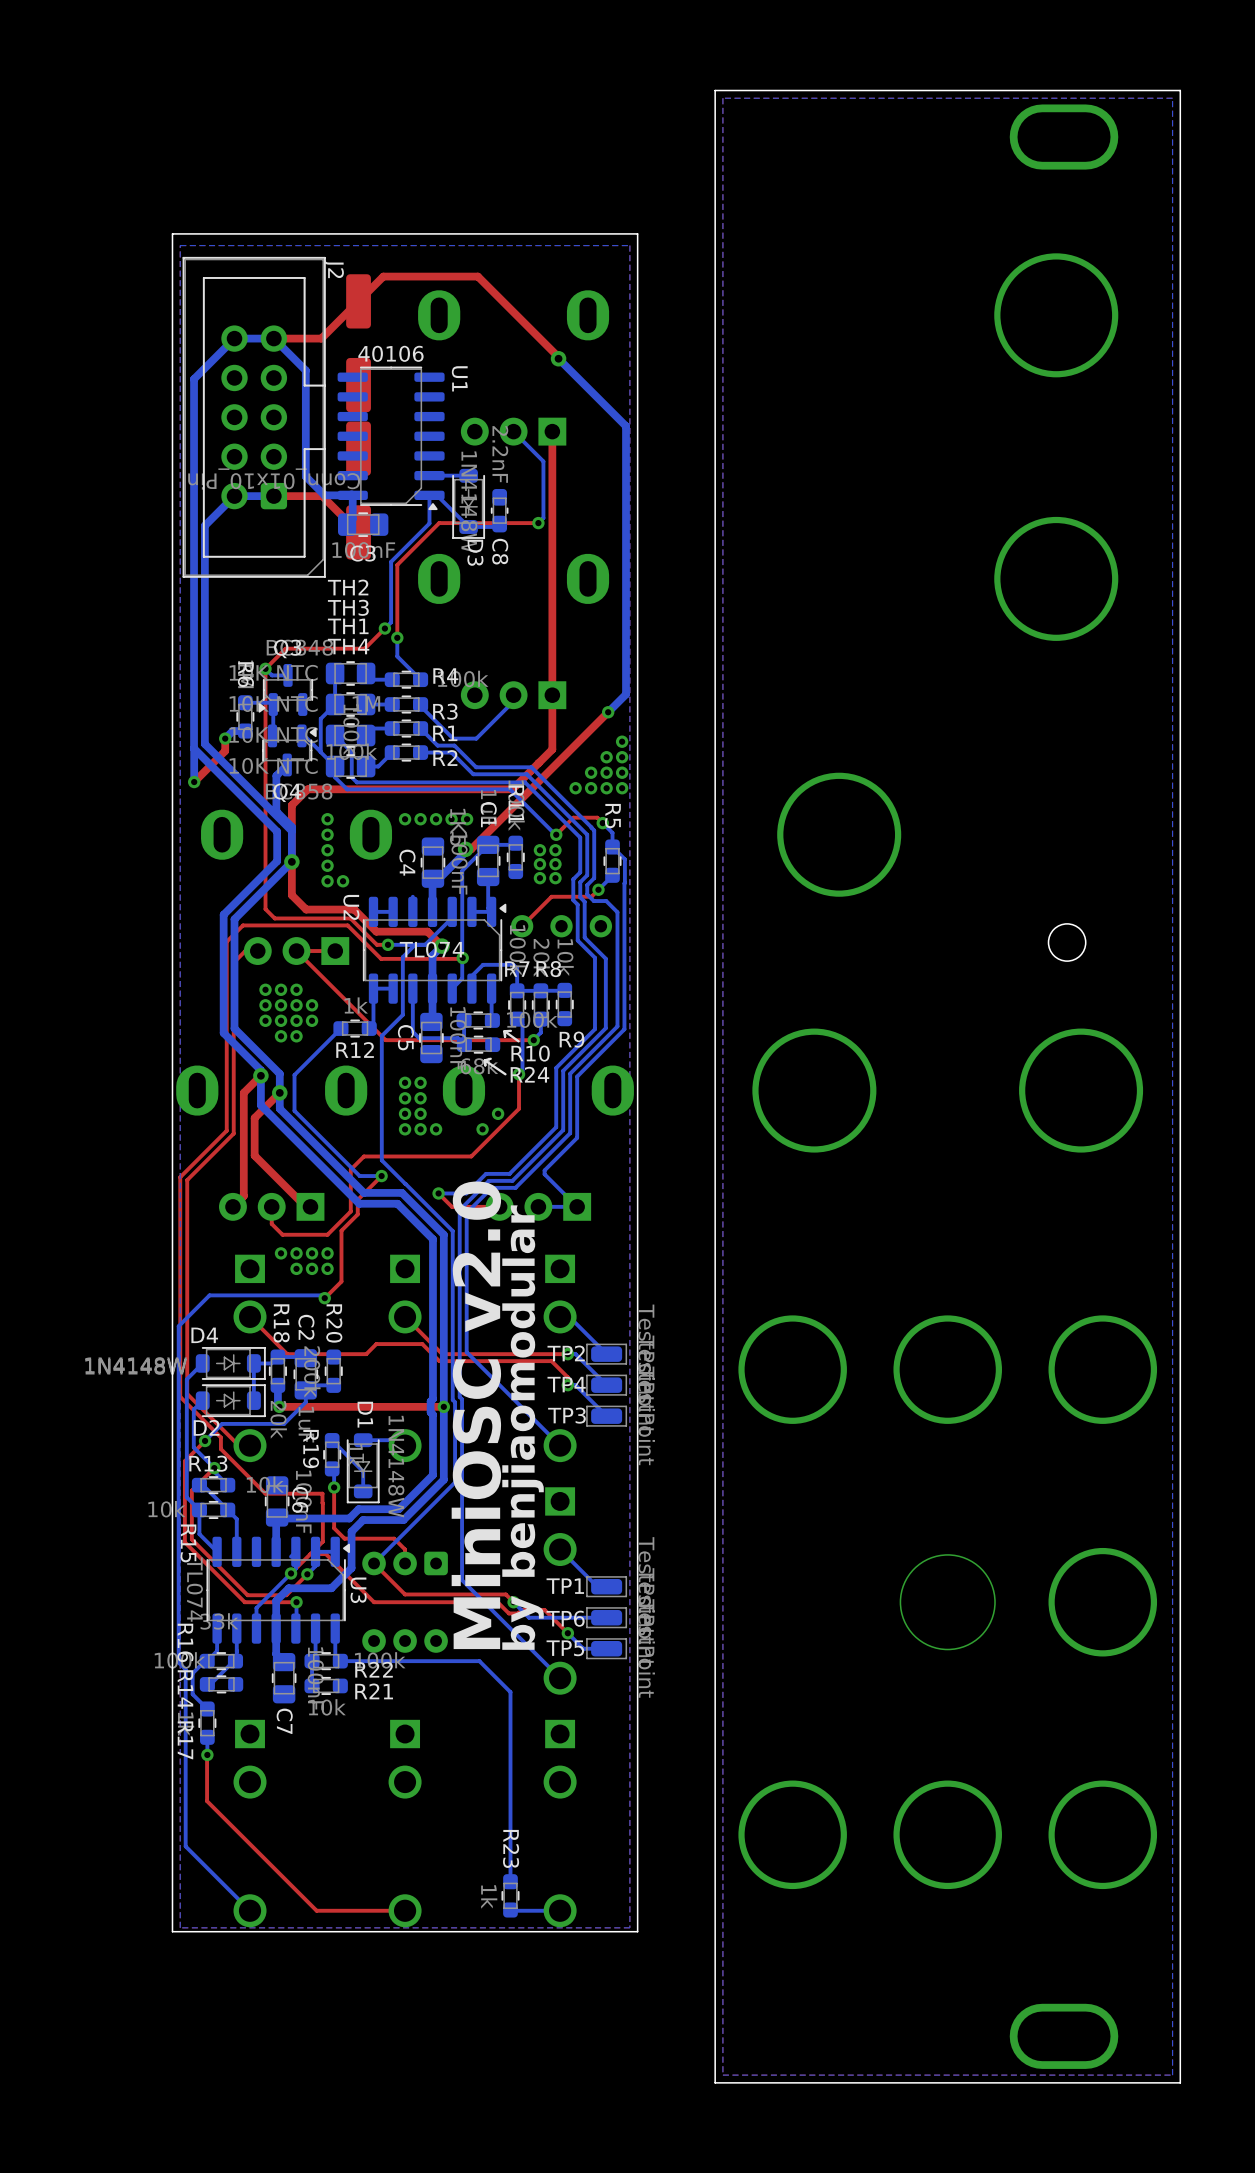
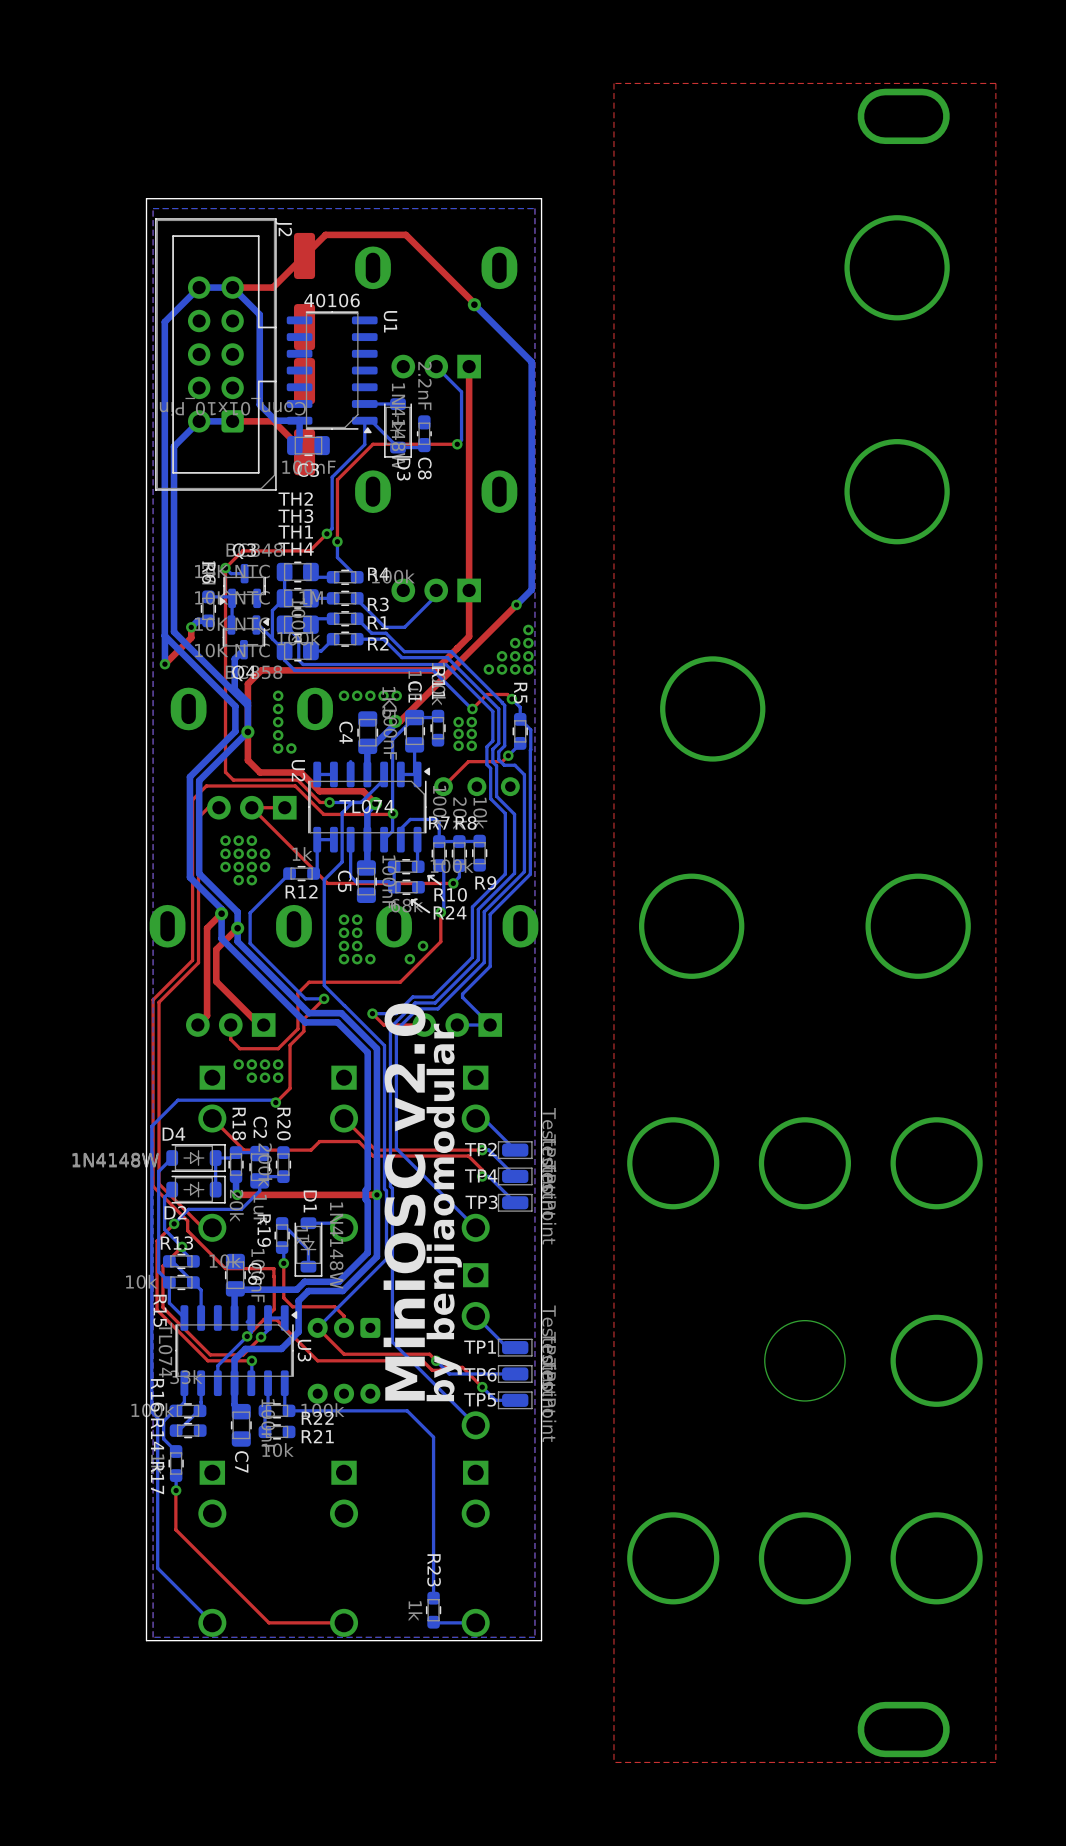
board edge: (1180, 90) (715, 90) (715, 2082) (1180, 2082) (1180, 90) -> none
bottom zone outline: (1172, 98) (1172, 2075) (722, 2075) (722, 98) (1172, 98) -> none
round board edge: [1047, 923, 1087, 962] -> none

